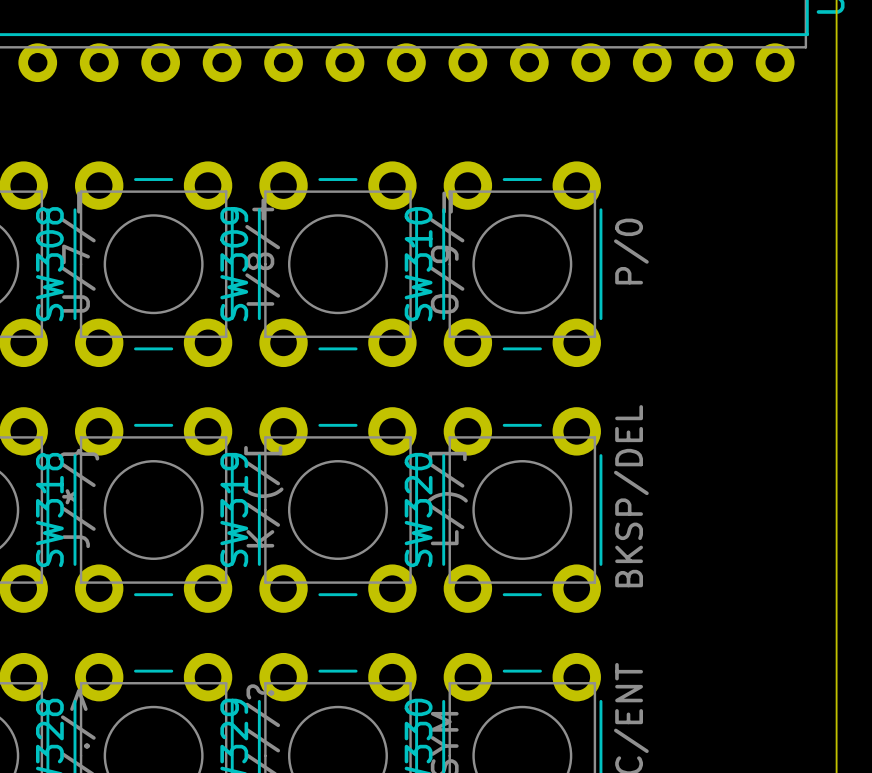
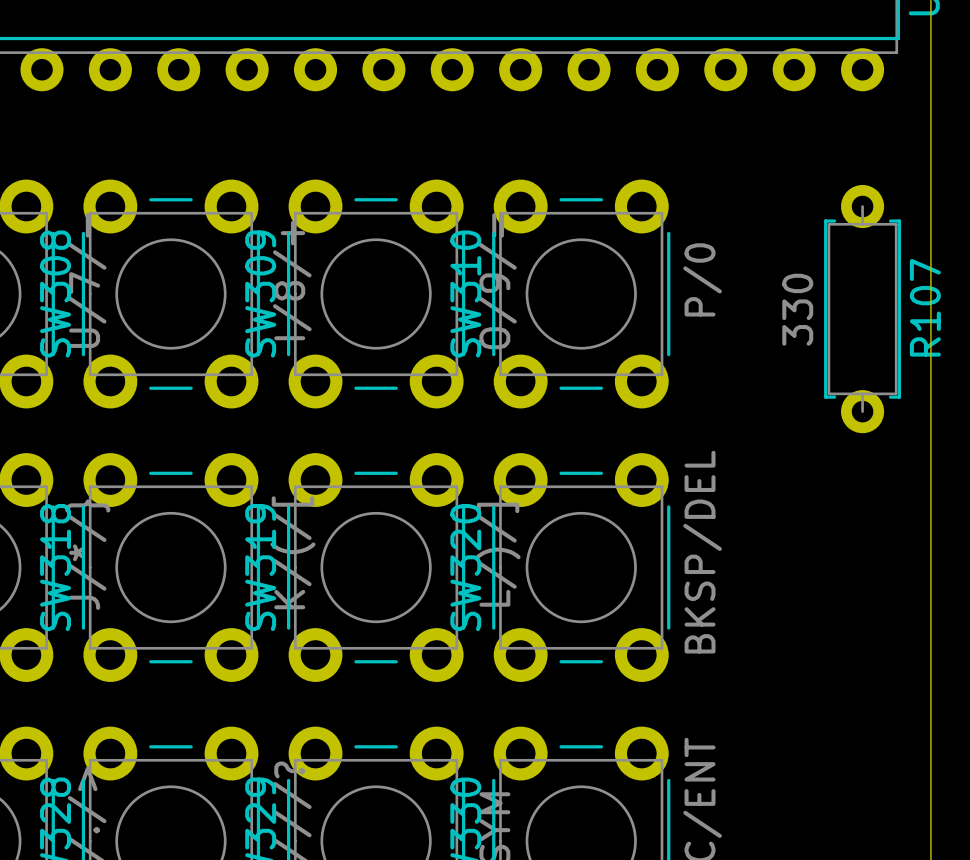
R107: none -> 330 (862, 309)

